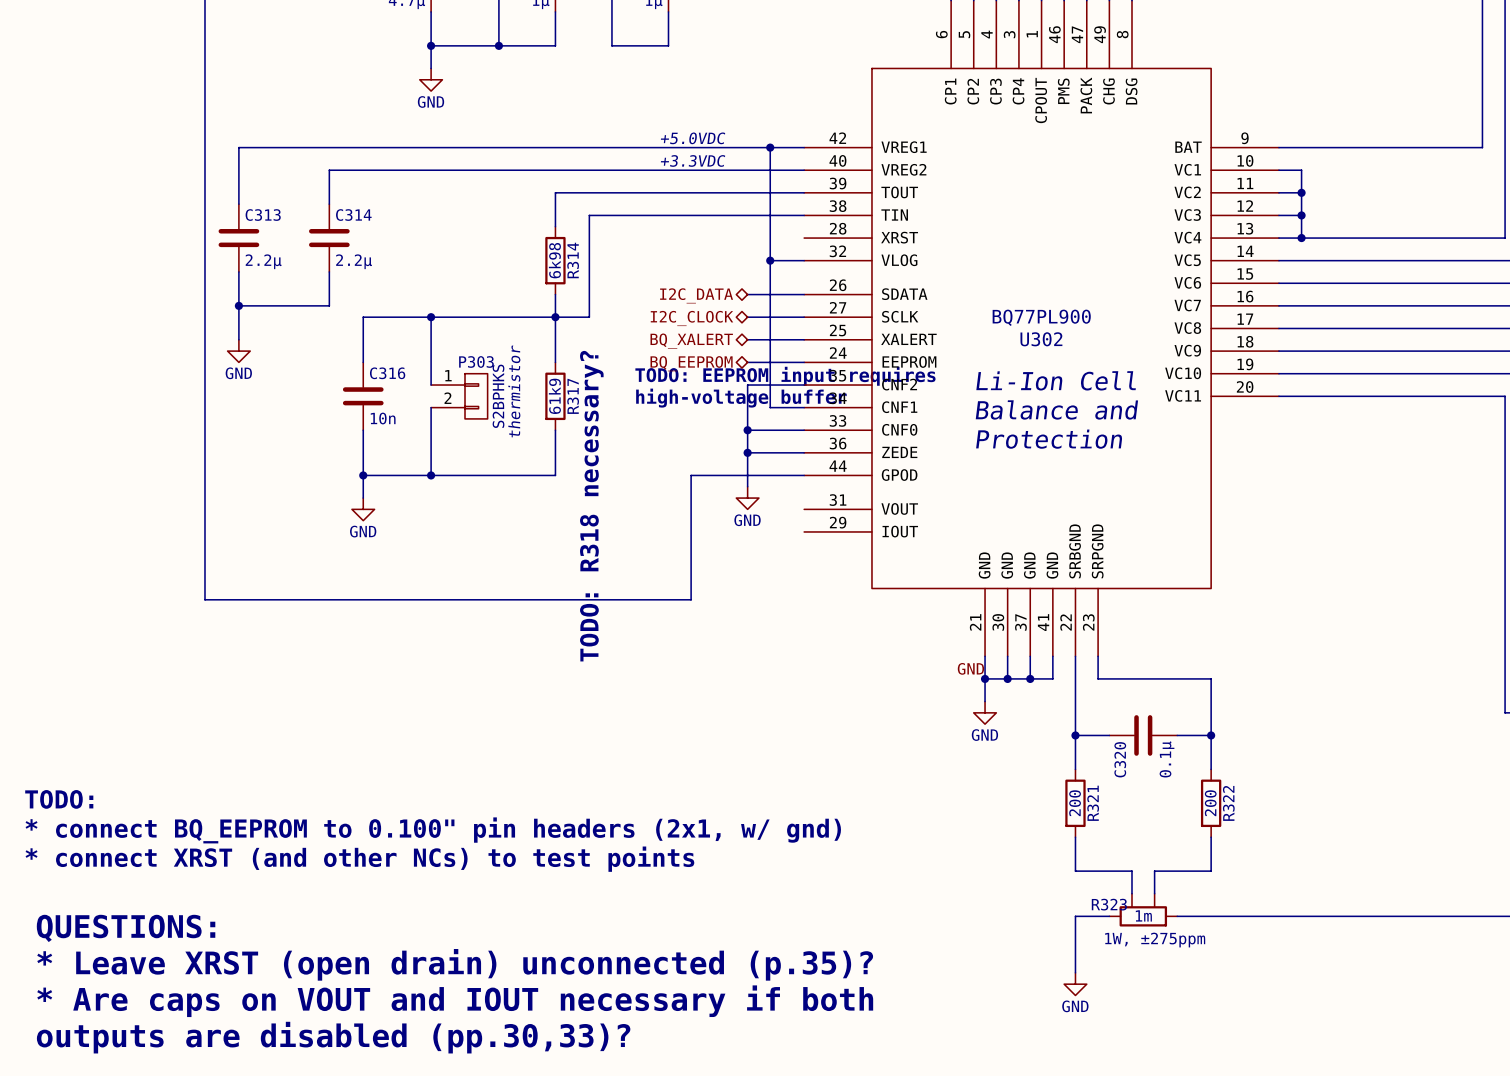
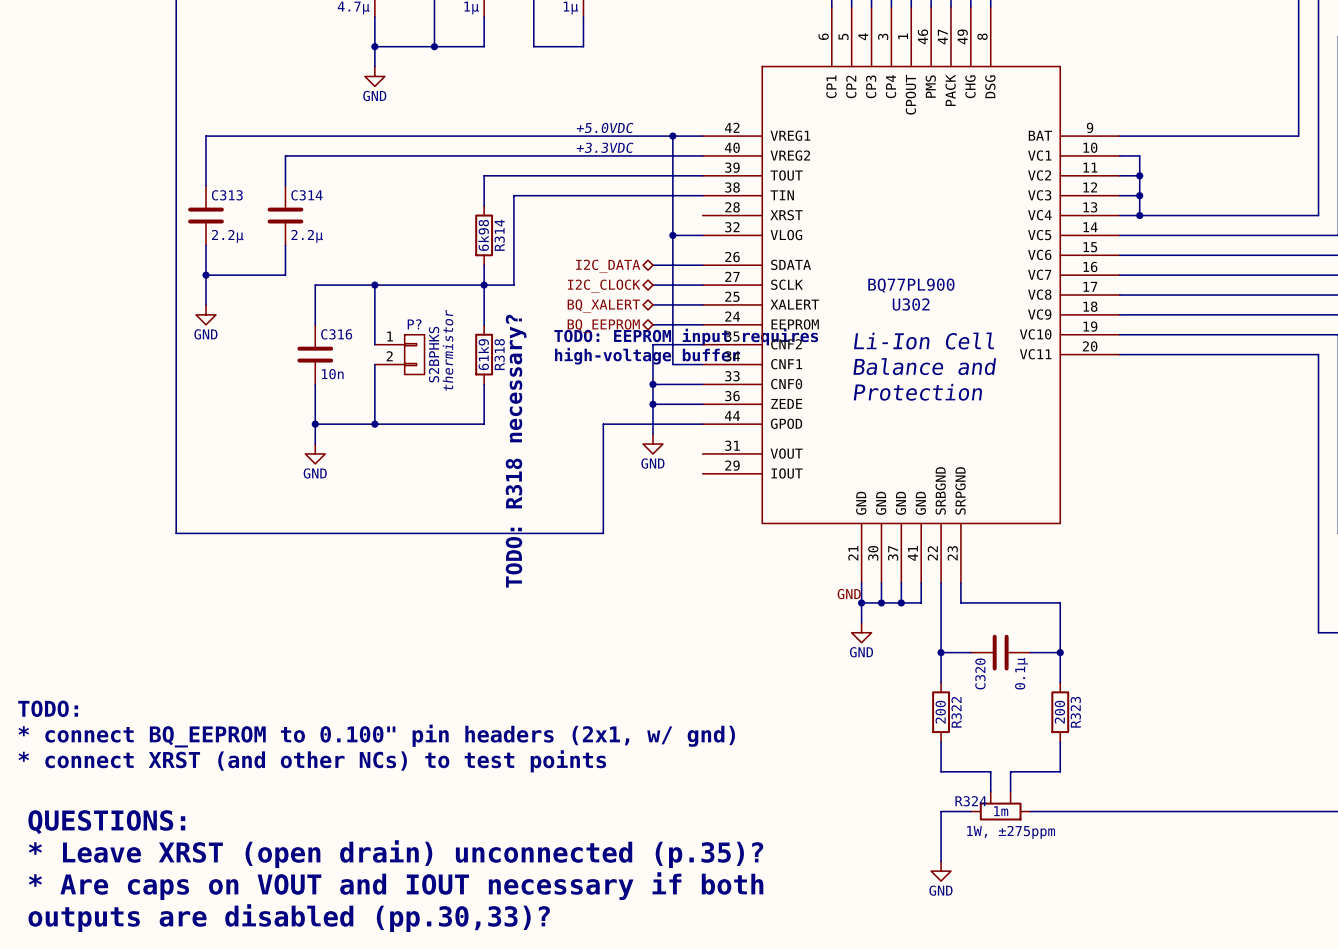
P303 name: P303 (476, 361) -> P? (414, 324)
R317 name: R317 (573, 396) -> R318 (499, 354)
R321 name: R321 (1093, 803) -> R322 (956, 712)
R322 name: R322 (1228, 803) -> R323 (1075, 712)
R323 name: R323 (1109, 904) -> R324 (971, 801)

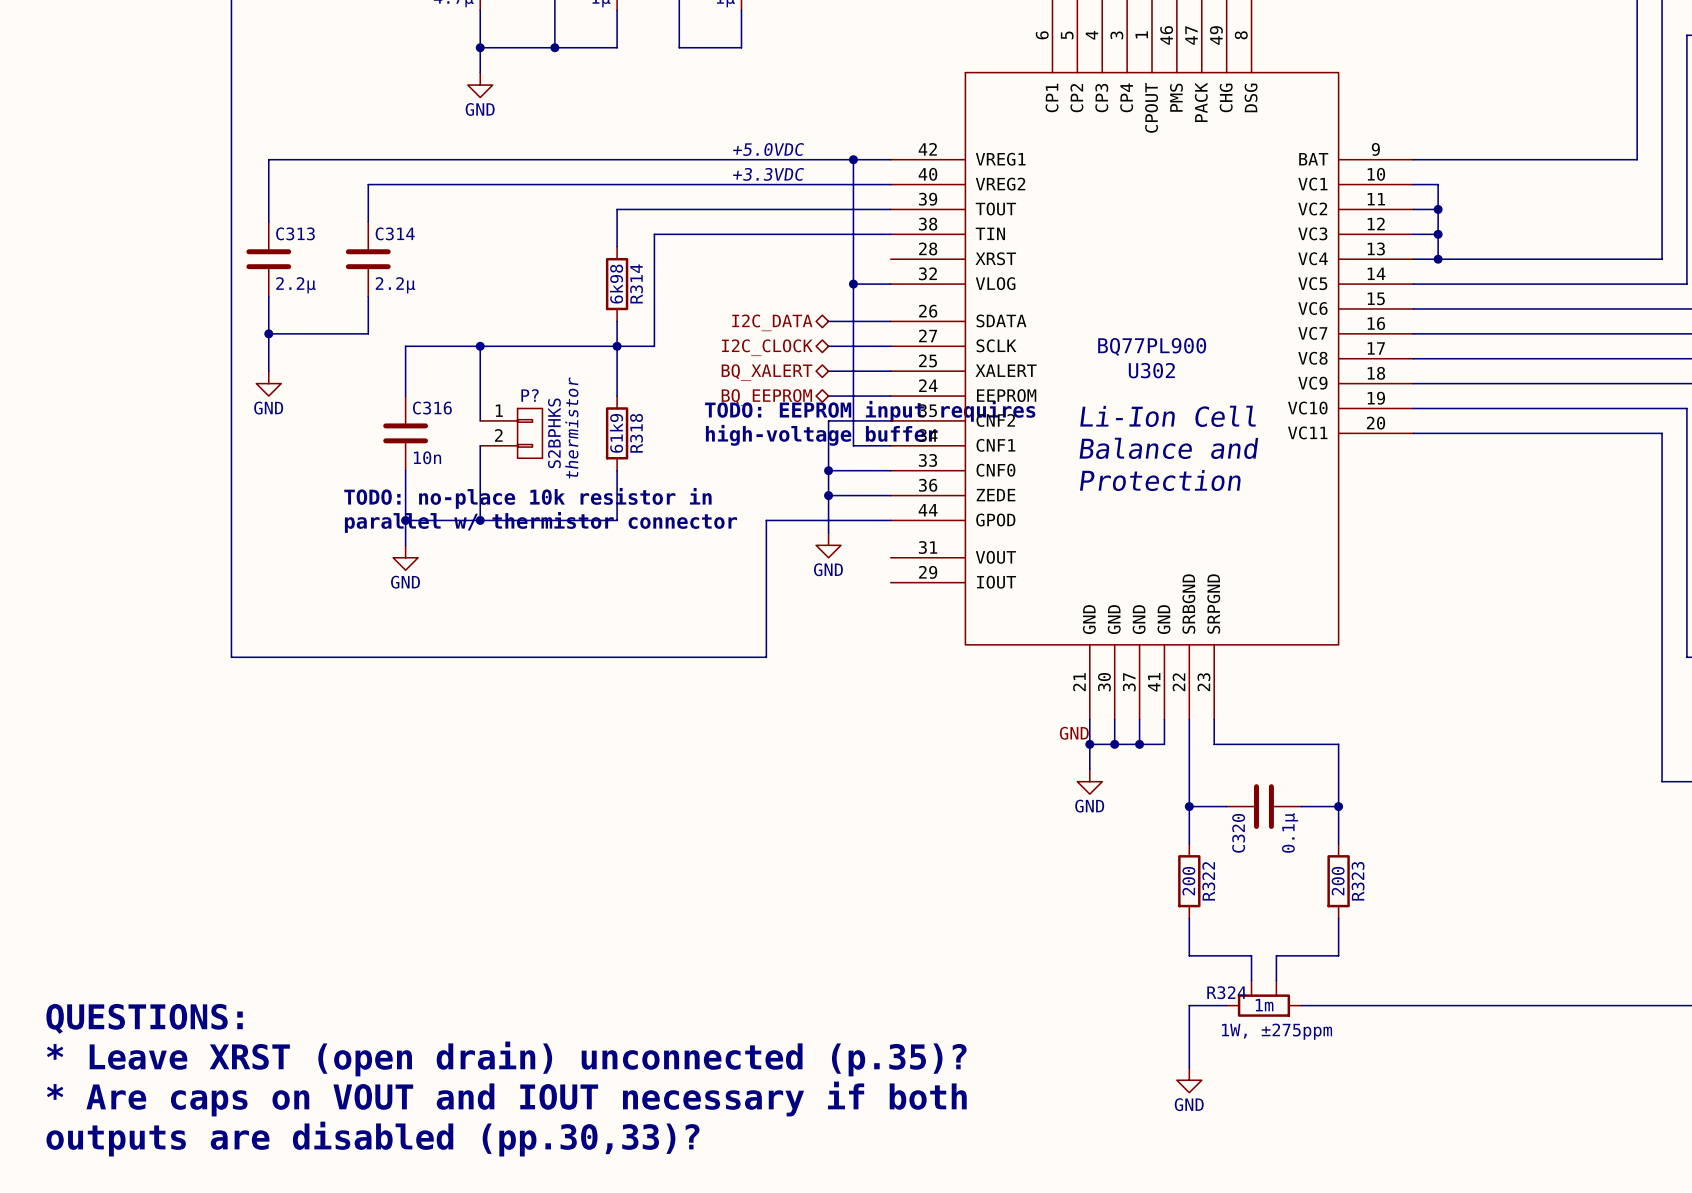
text: none -> TODO: no-place 10k resistor in (527, 498)
text: none -> parallel w/ thermistor connector (540, 522)
text: TODO: R318 necessary? (516, 451) -> none
text: TODO: (48, 708) -> none
text: * connect BQ_EEPROM to 0.100" pin headers (2x1, w/ gnd) (376, 736) -> none
text: * connect XRST (and other NCs) to test points (312, 761) -> none

